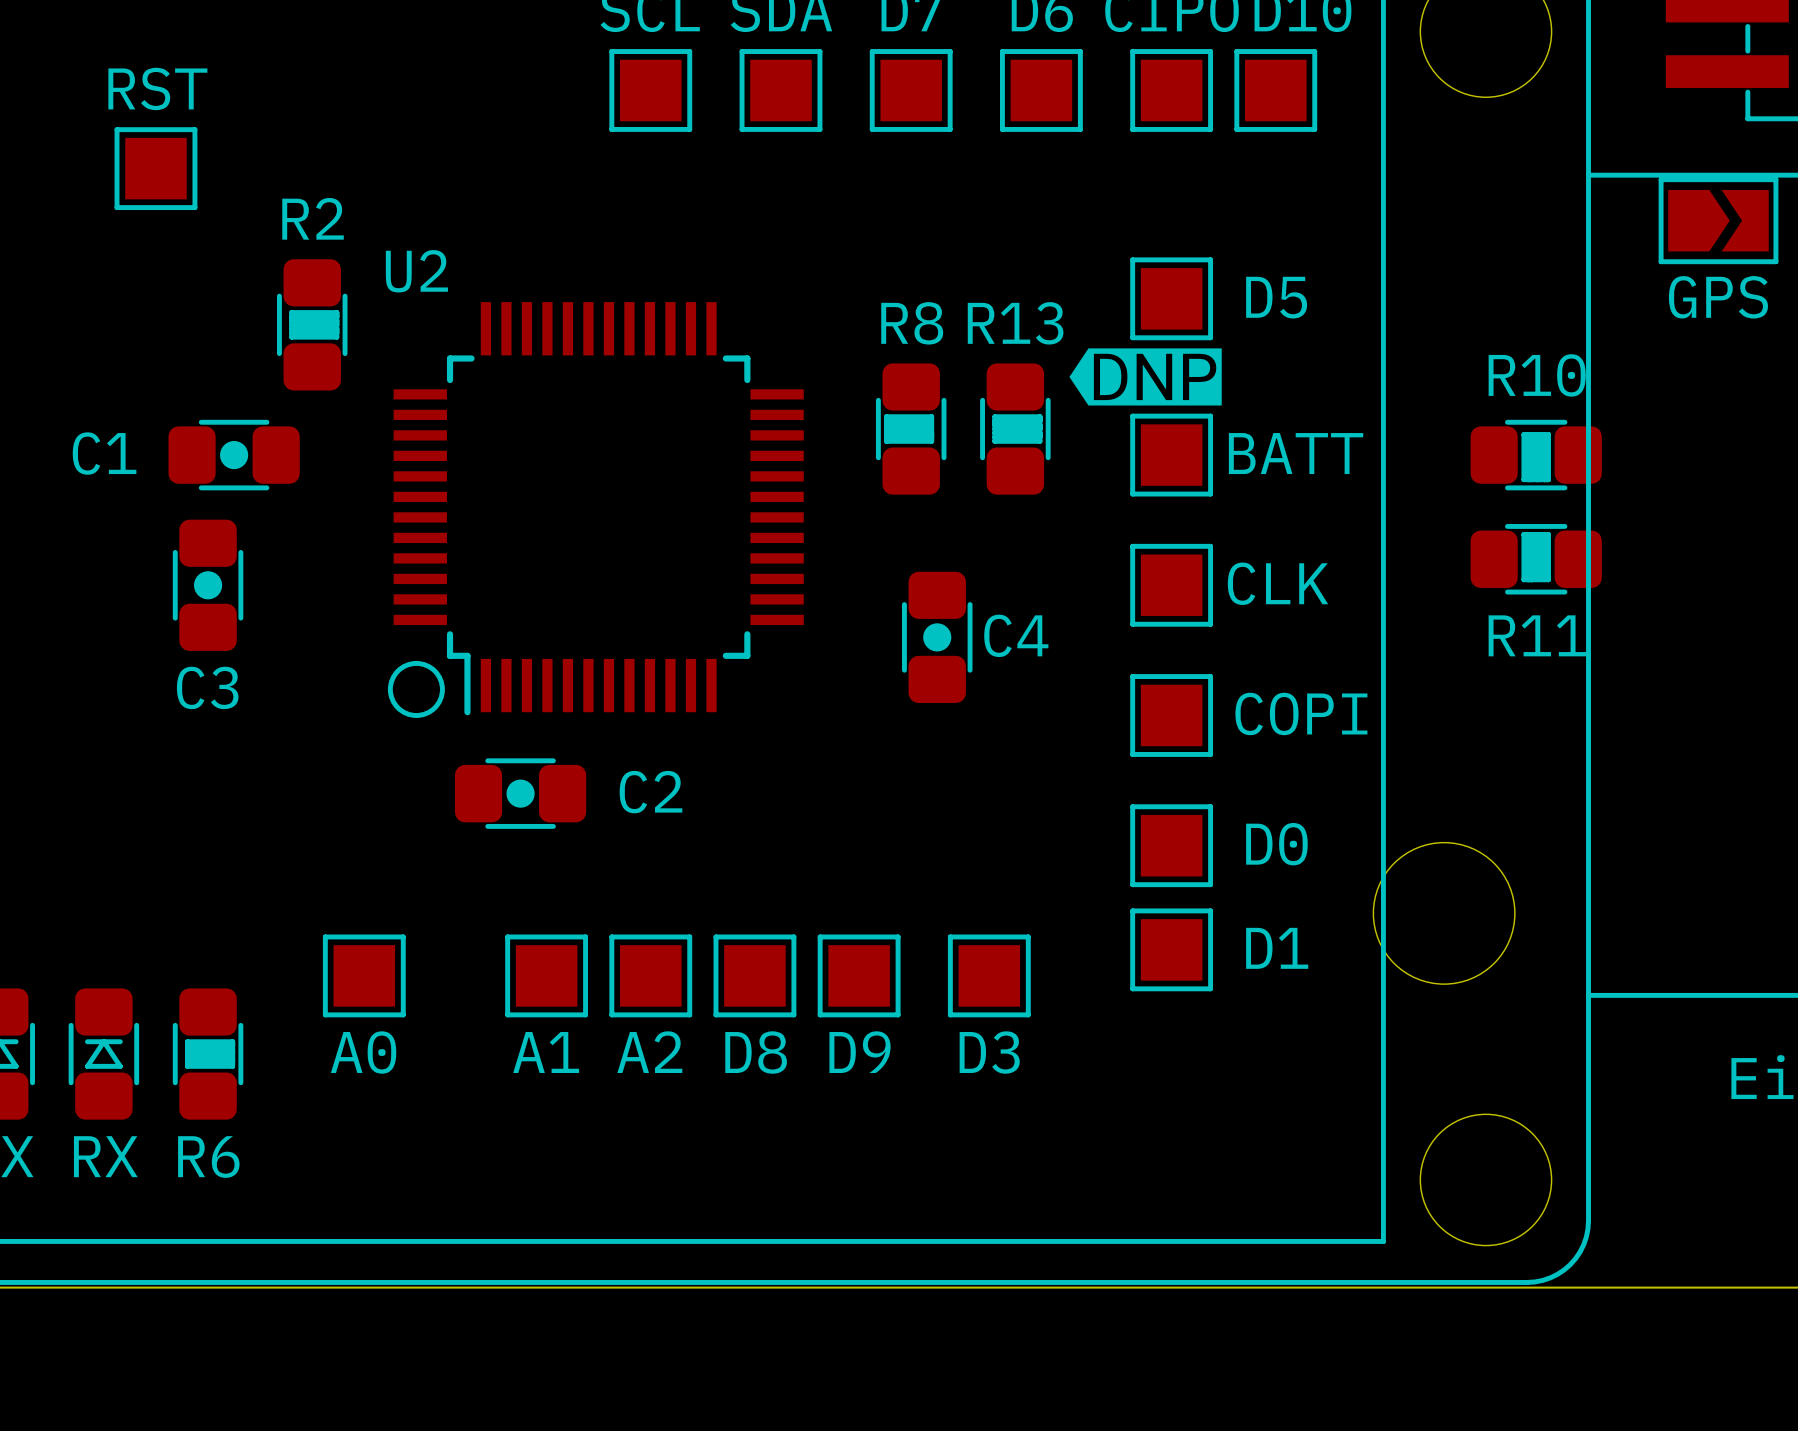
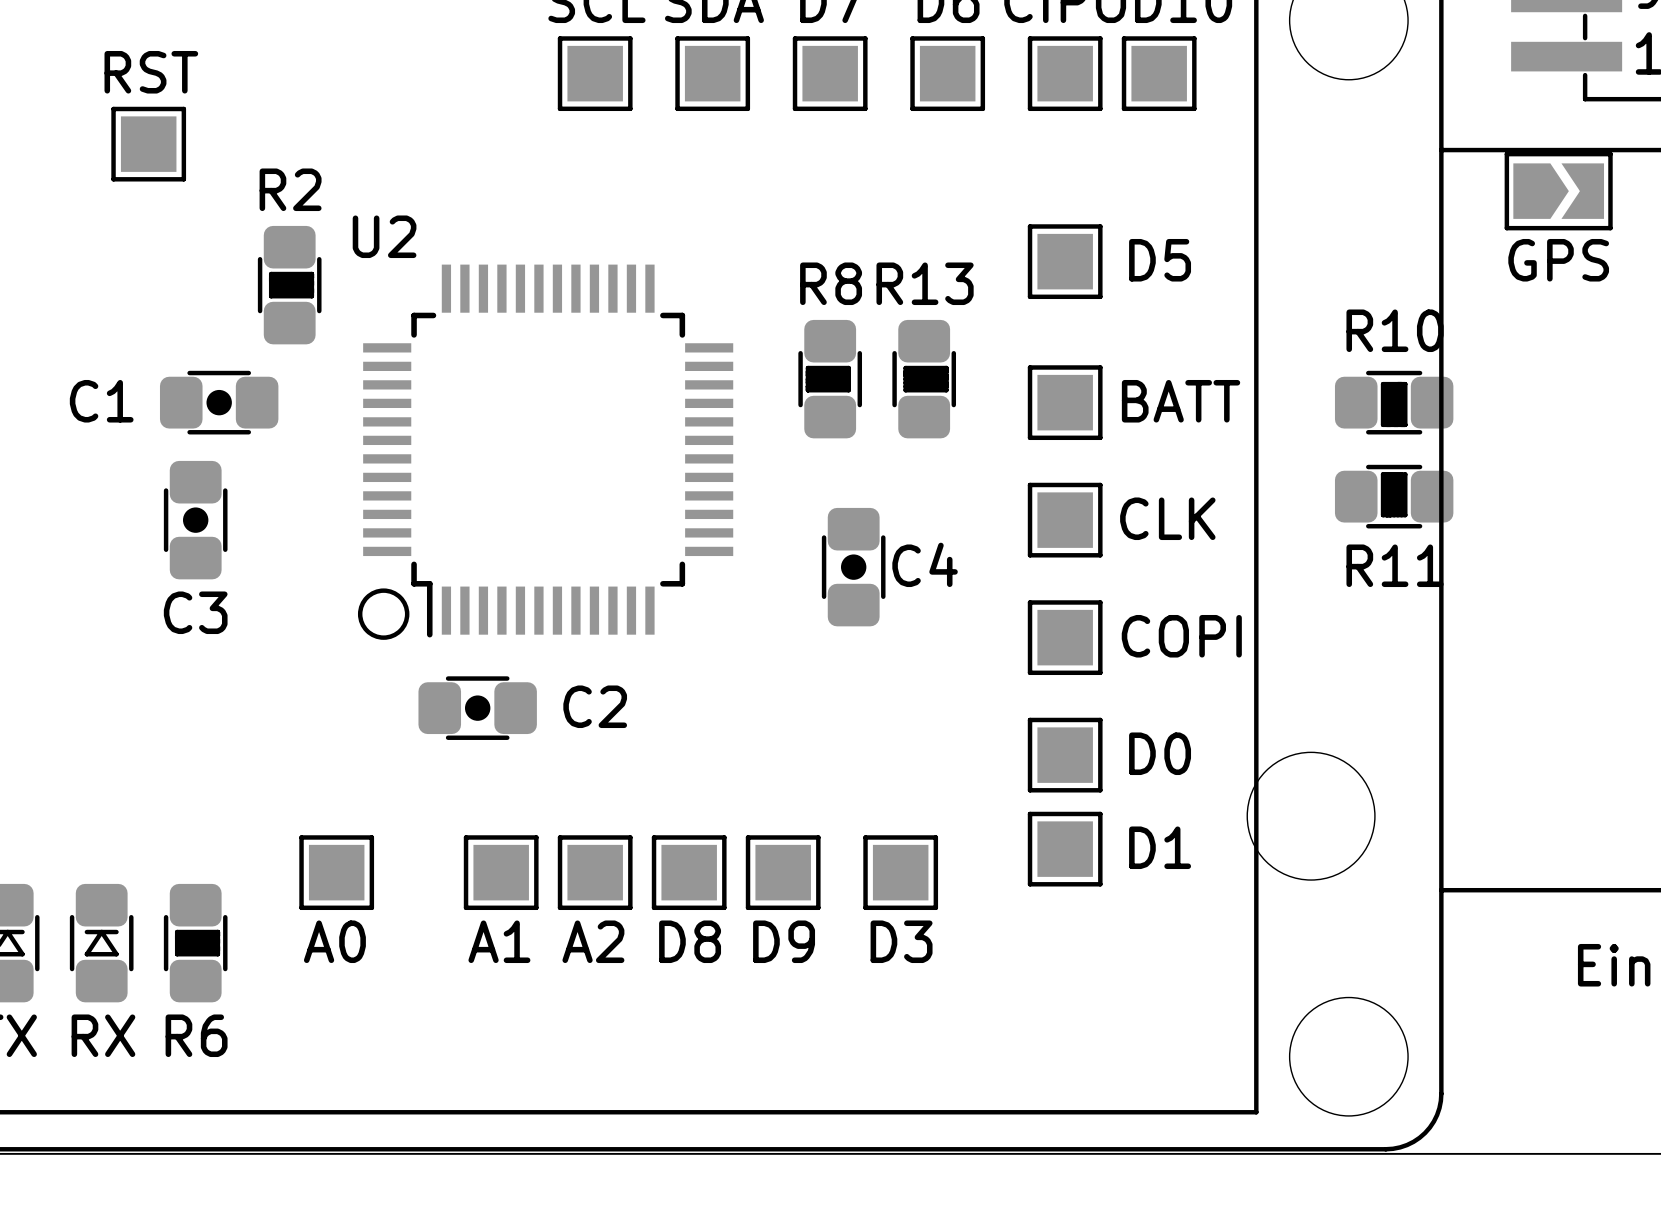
drawing: [1069, 348, 1222, 406] -> none

